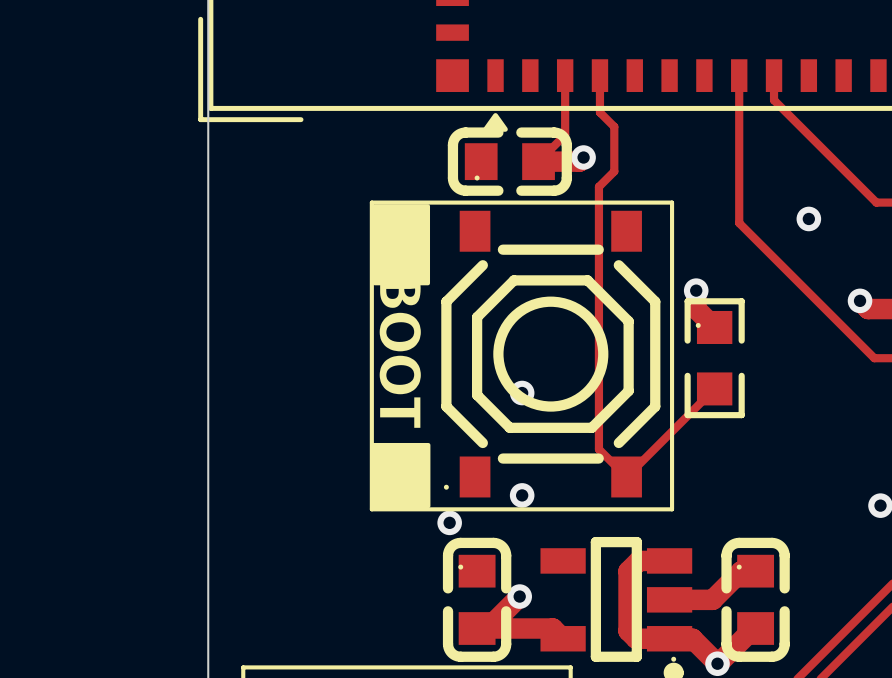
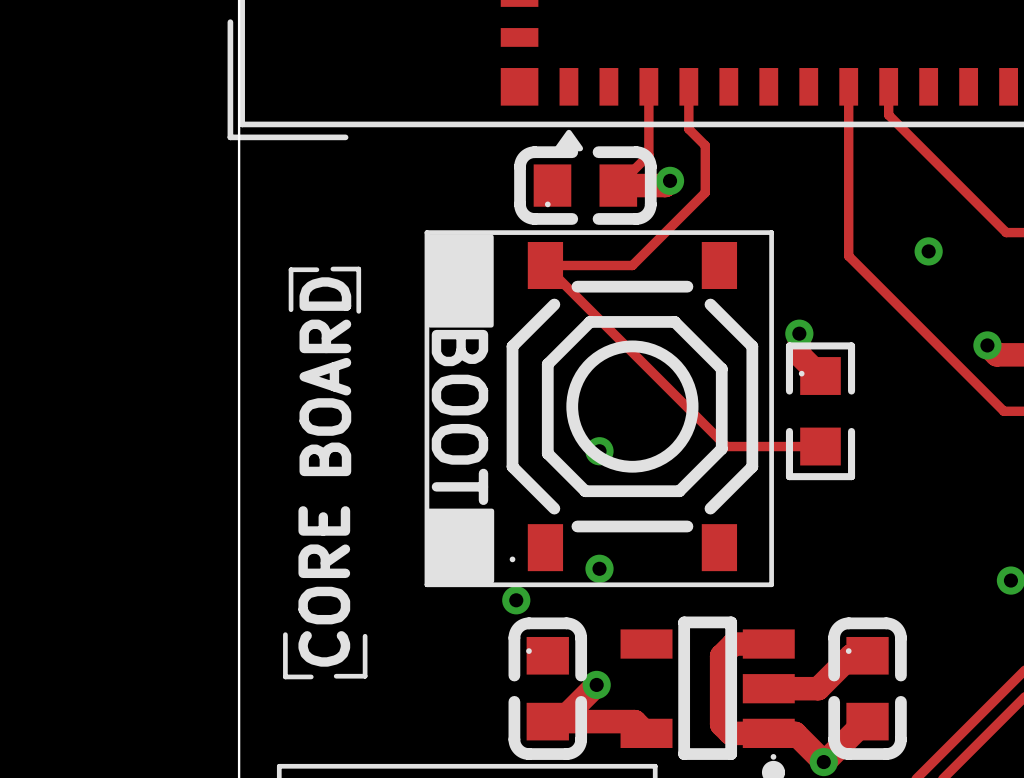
top track: (614, 167) (614, 171) (598, 186) (598, 449) (626, 476) (714, 388) -> (705, 192) (632, 265) (545, 265) (726, 446) (820, 446)
line: none -> (316, 269) (291, 269) (291, 309)
line: none -> (332, 269) (358, 269) (358, 311)
text: none -> BOARD (325, 376)
text: none -> CORE (324, 586)
line: none -> (285, 634) (285, 676) (311, 676)
line: none -> (365, 636) (365, 676) (336, 676)

